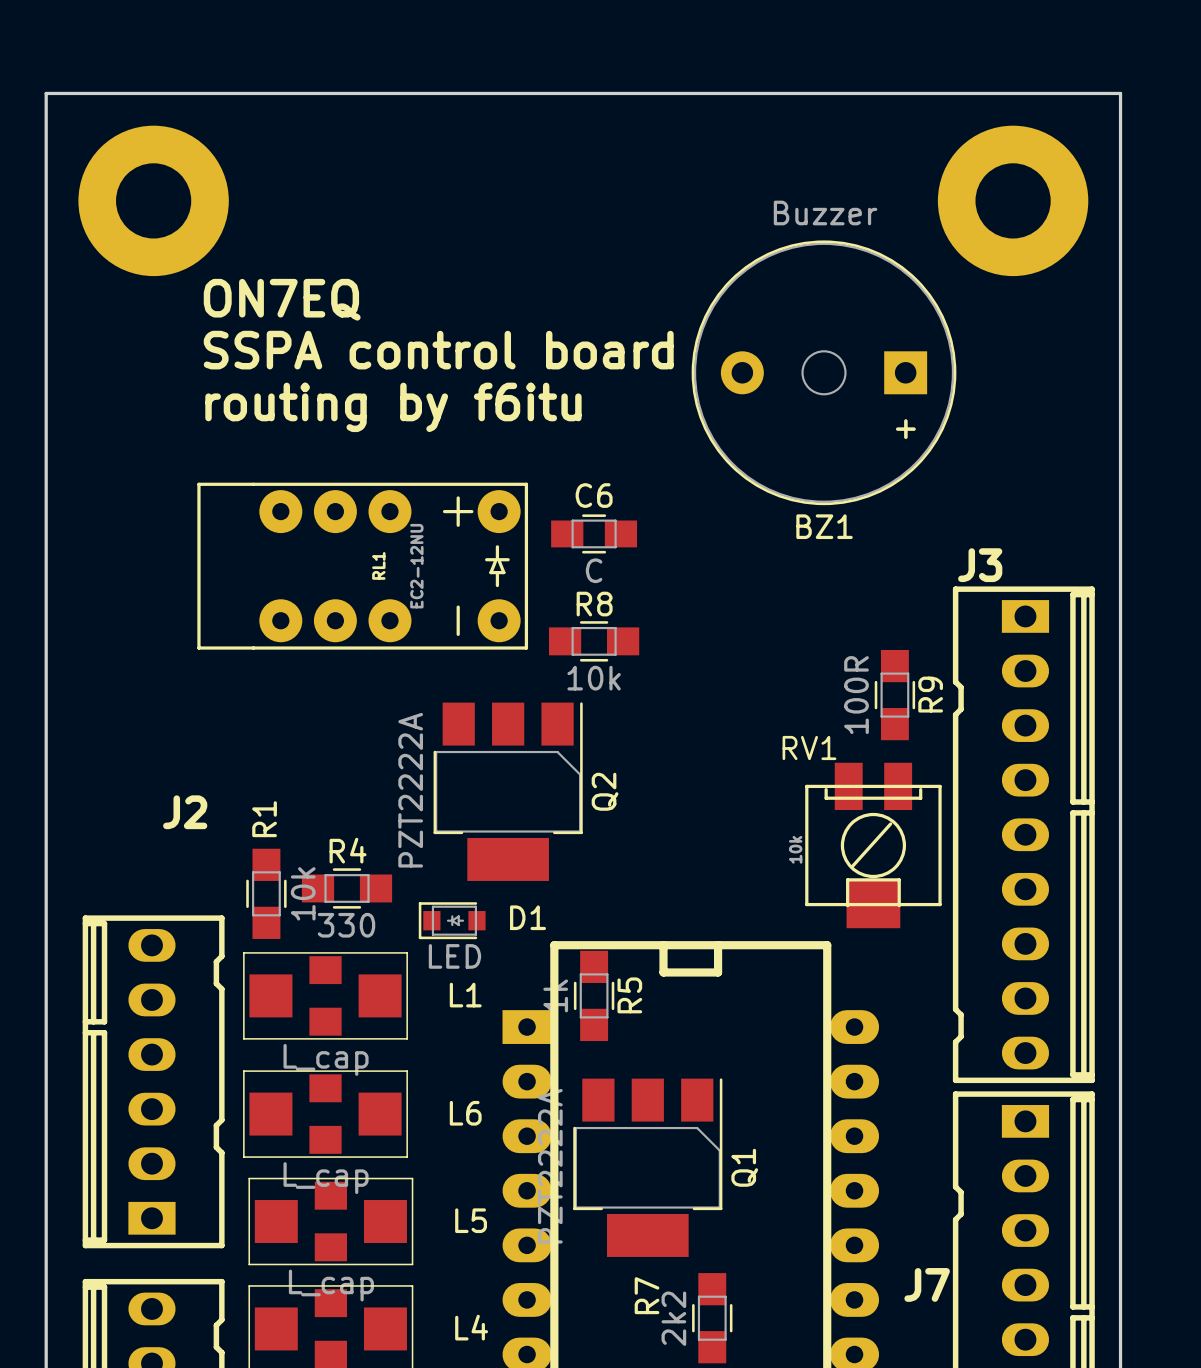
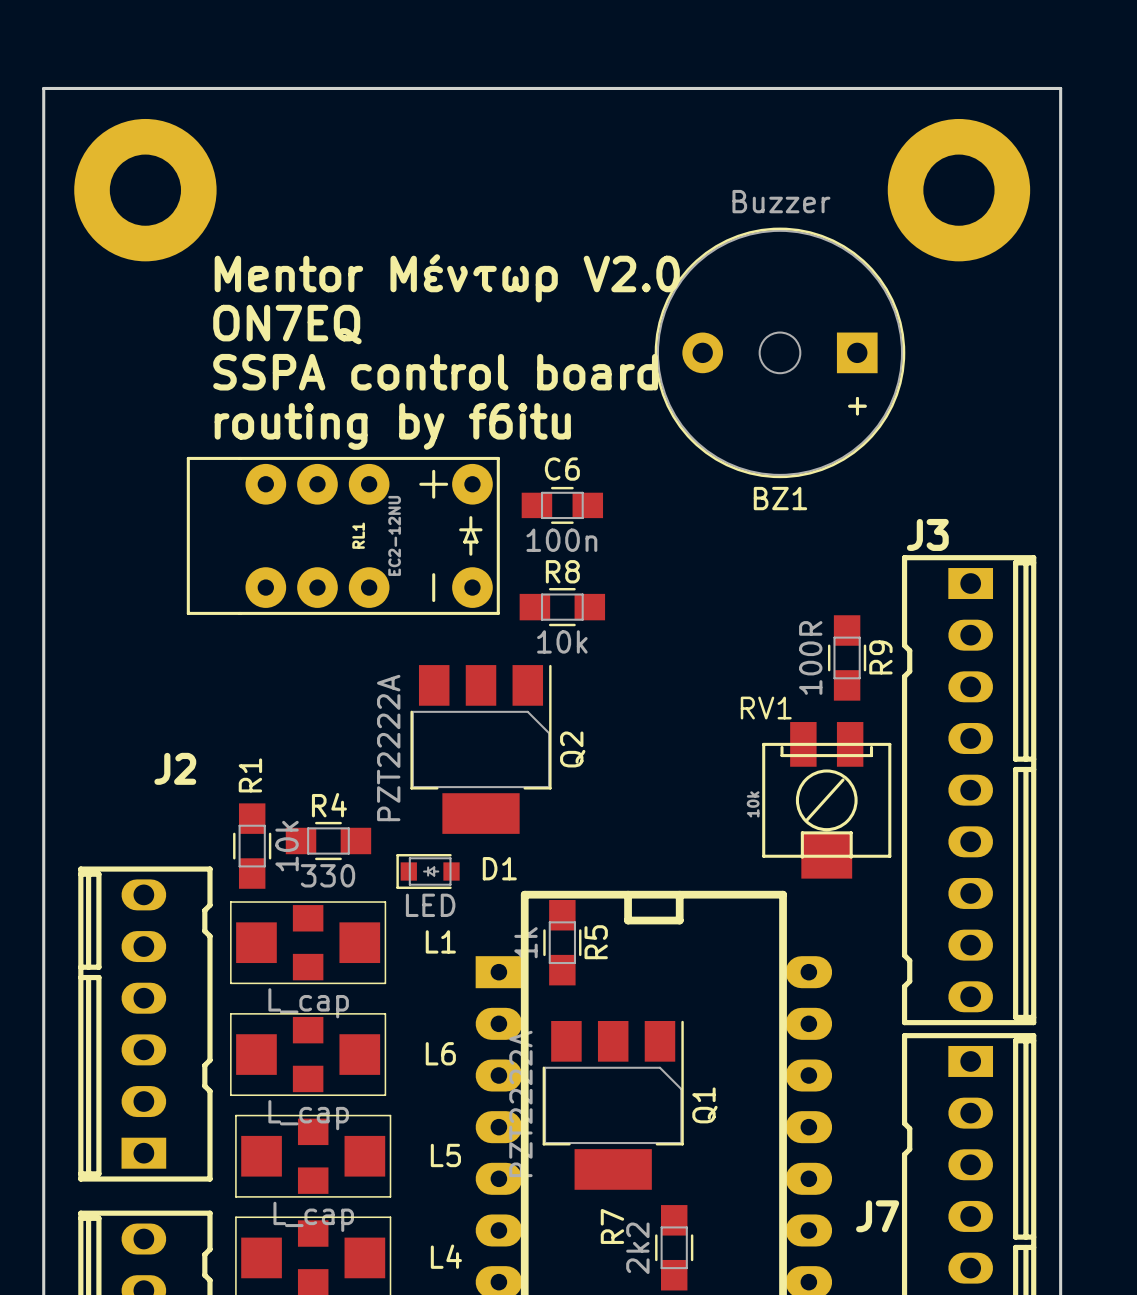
text: none -> Mentor Μέντωρ V2.0 (447, 278)
text position: ON7EQ (282, 299) -> ON7EQ (287, 324)
text position: SSPA control board (438, 350) -> SSPA control board (435, 372)
text position: routing by f6itu (393, 407) -> routing by f6itu (392, 426)
C6 value: C (594, 570) -> 100n (561, 540)

